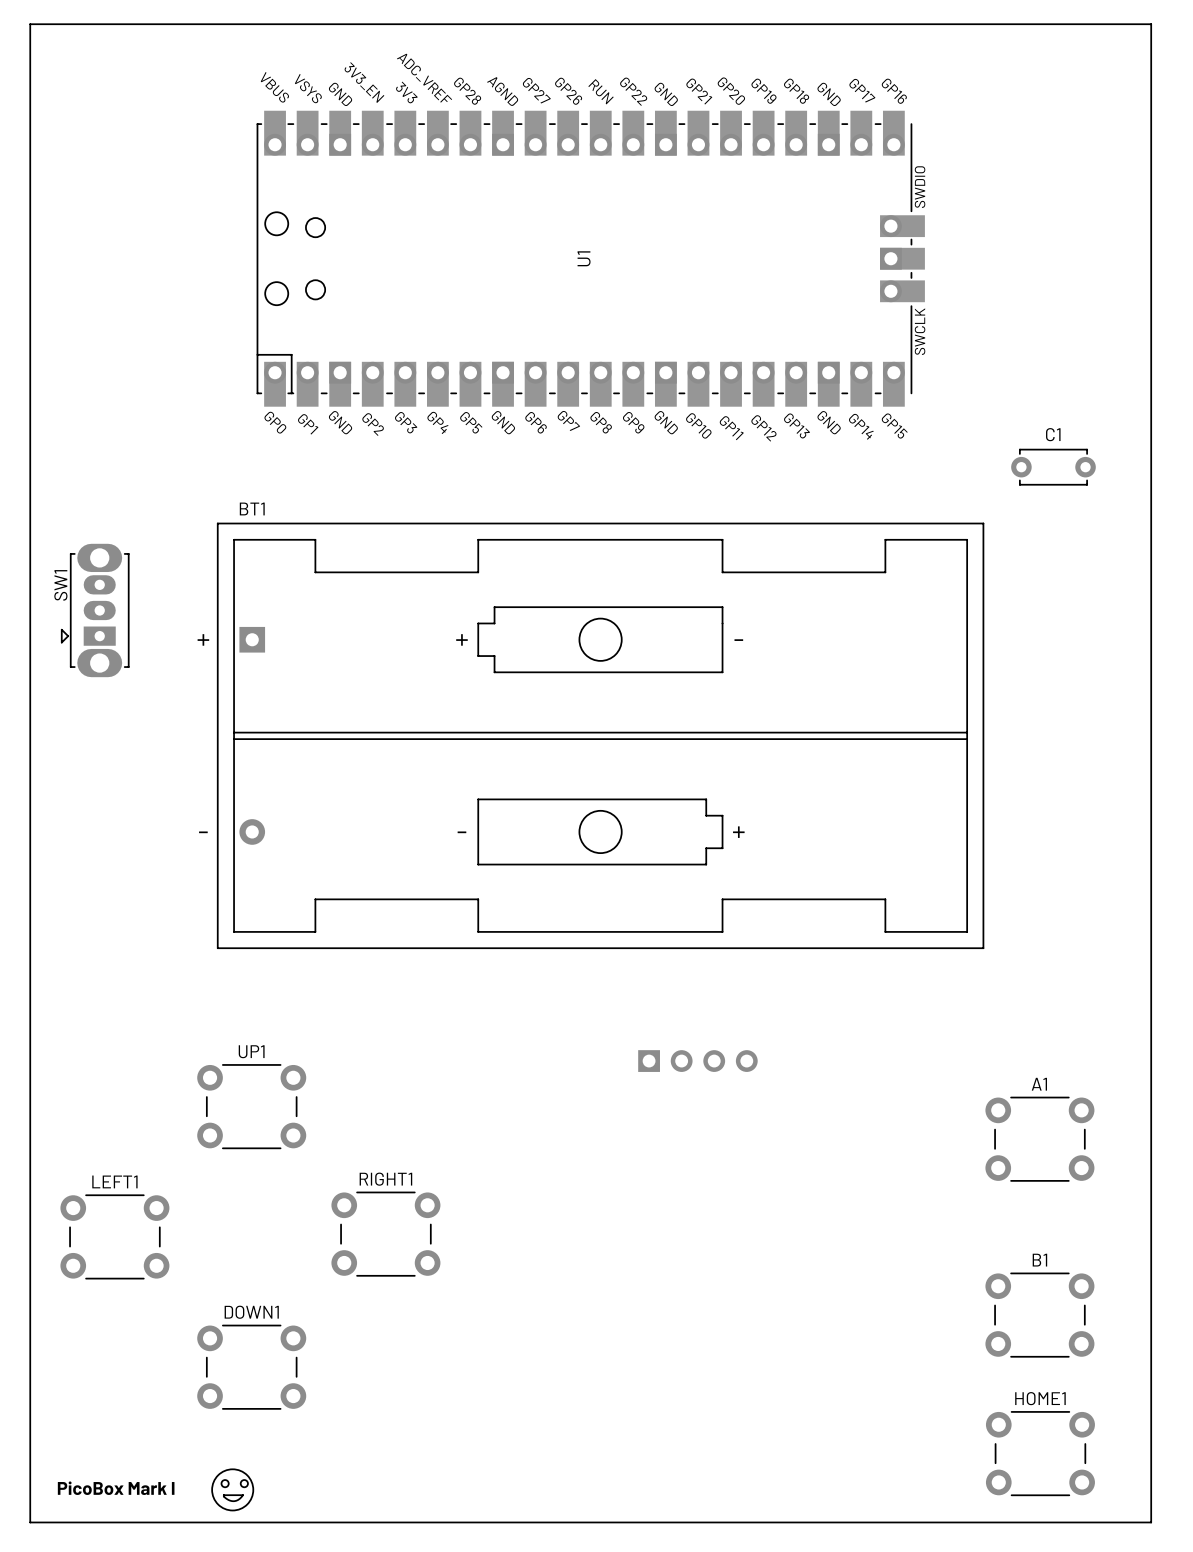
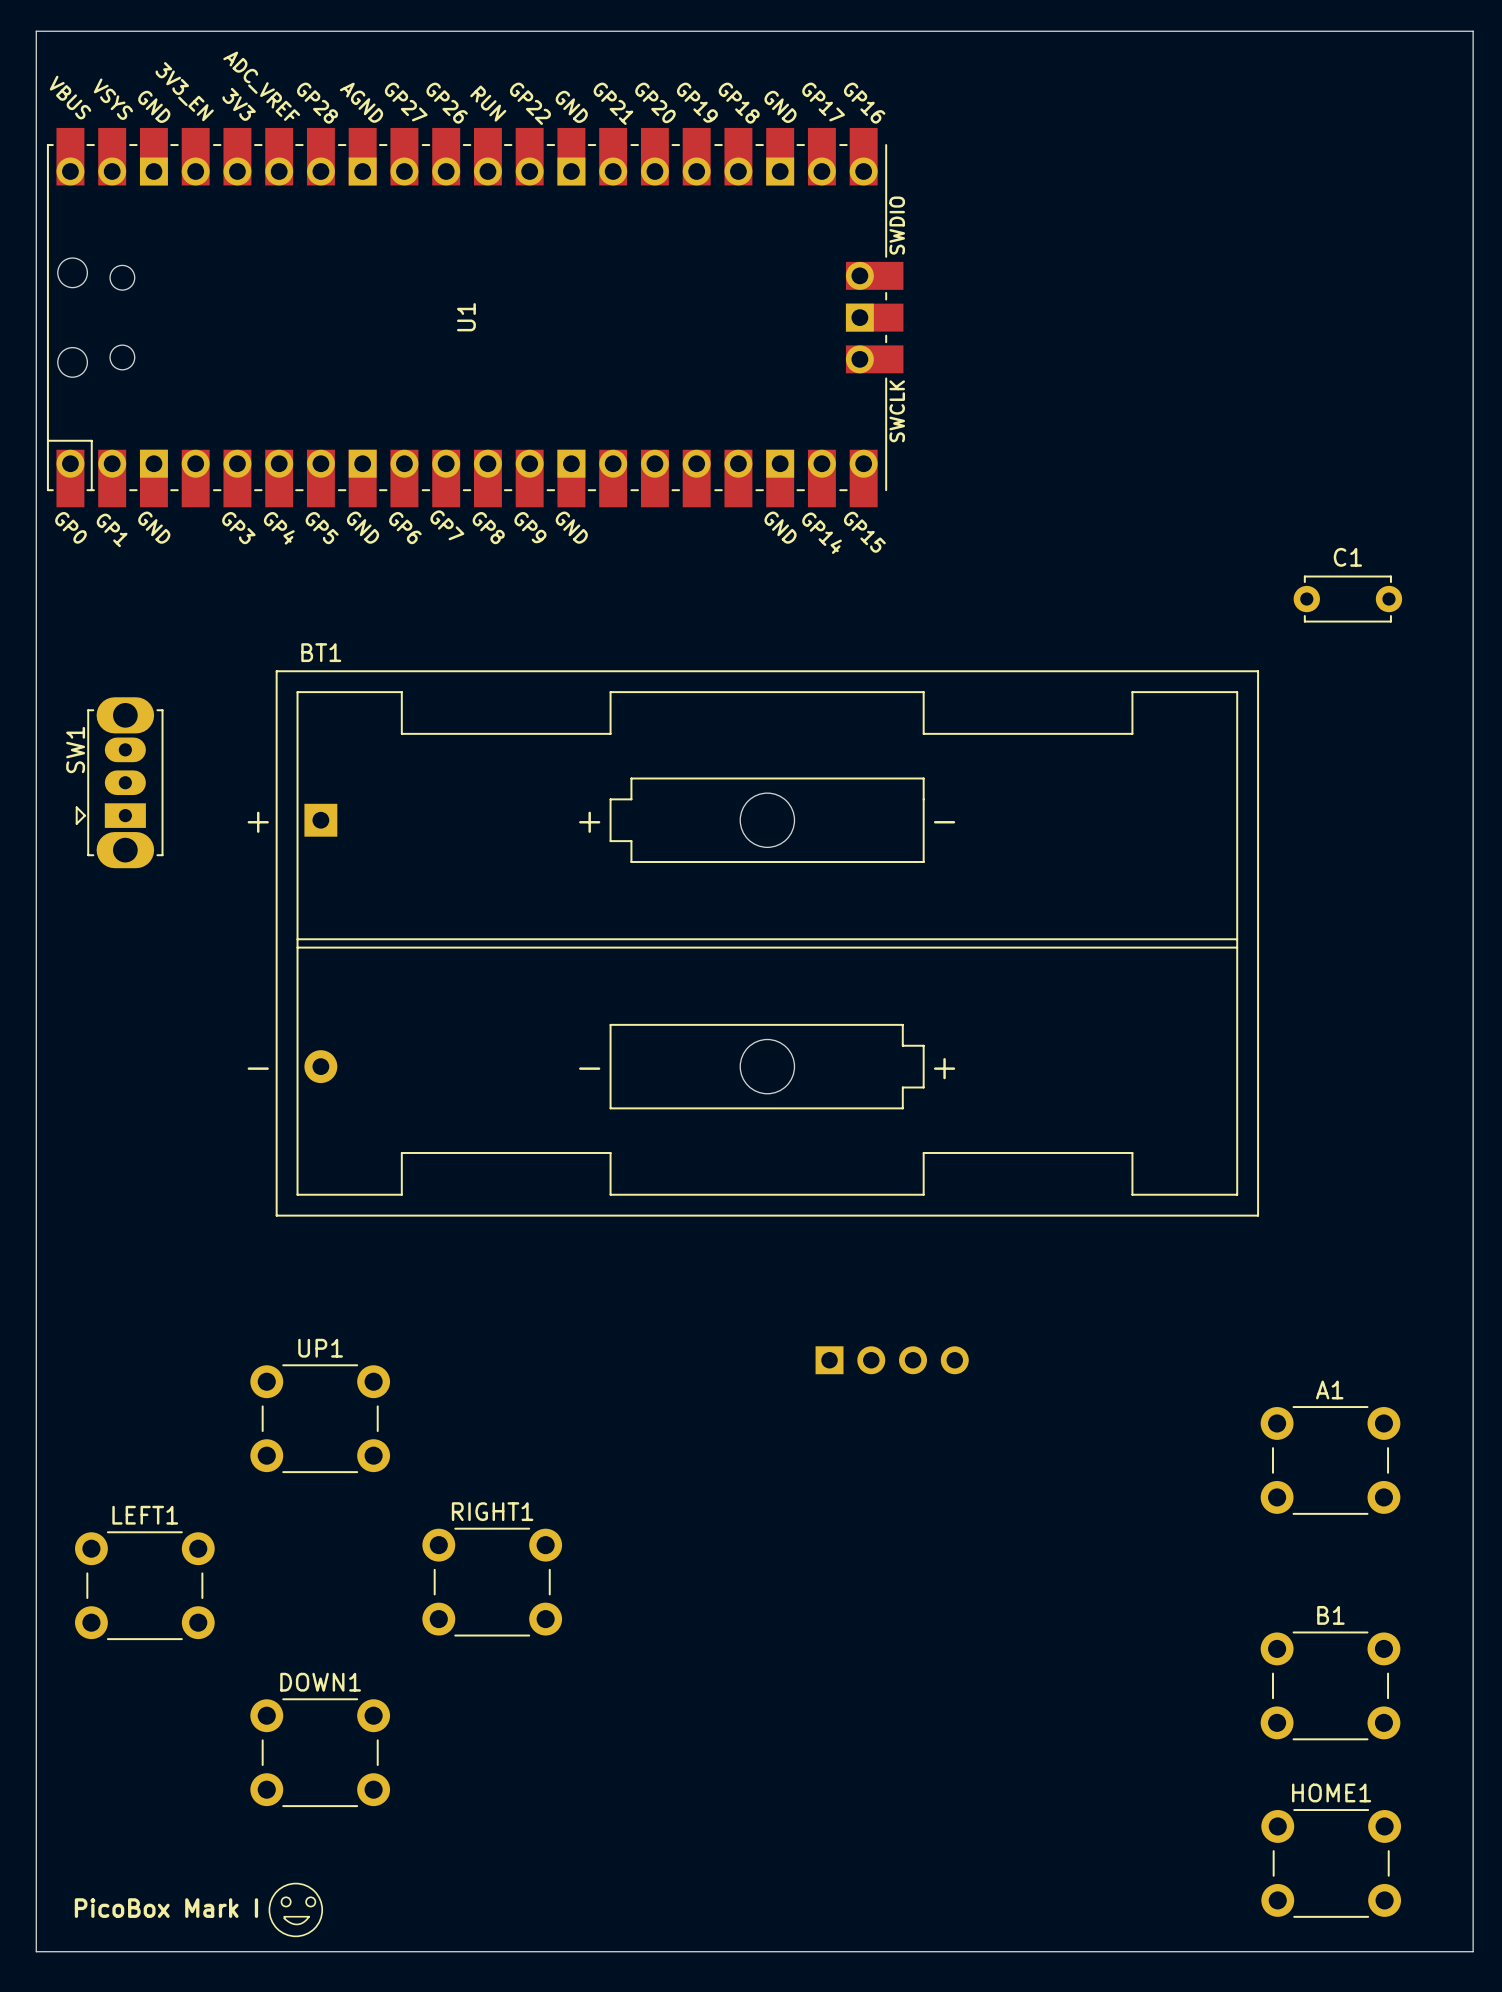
U1 position: (590, 258) -> (475, 317)
U1 text: GP2 (373, 424) -> none
U1 text: GP10 (698, 425) -> none
U1 text: GP13 (797, 425) -> none
U1 text: GP11 (731, 428) -> none
U1 text: GP12 (763, 428) -> none

